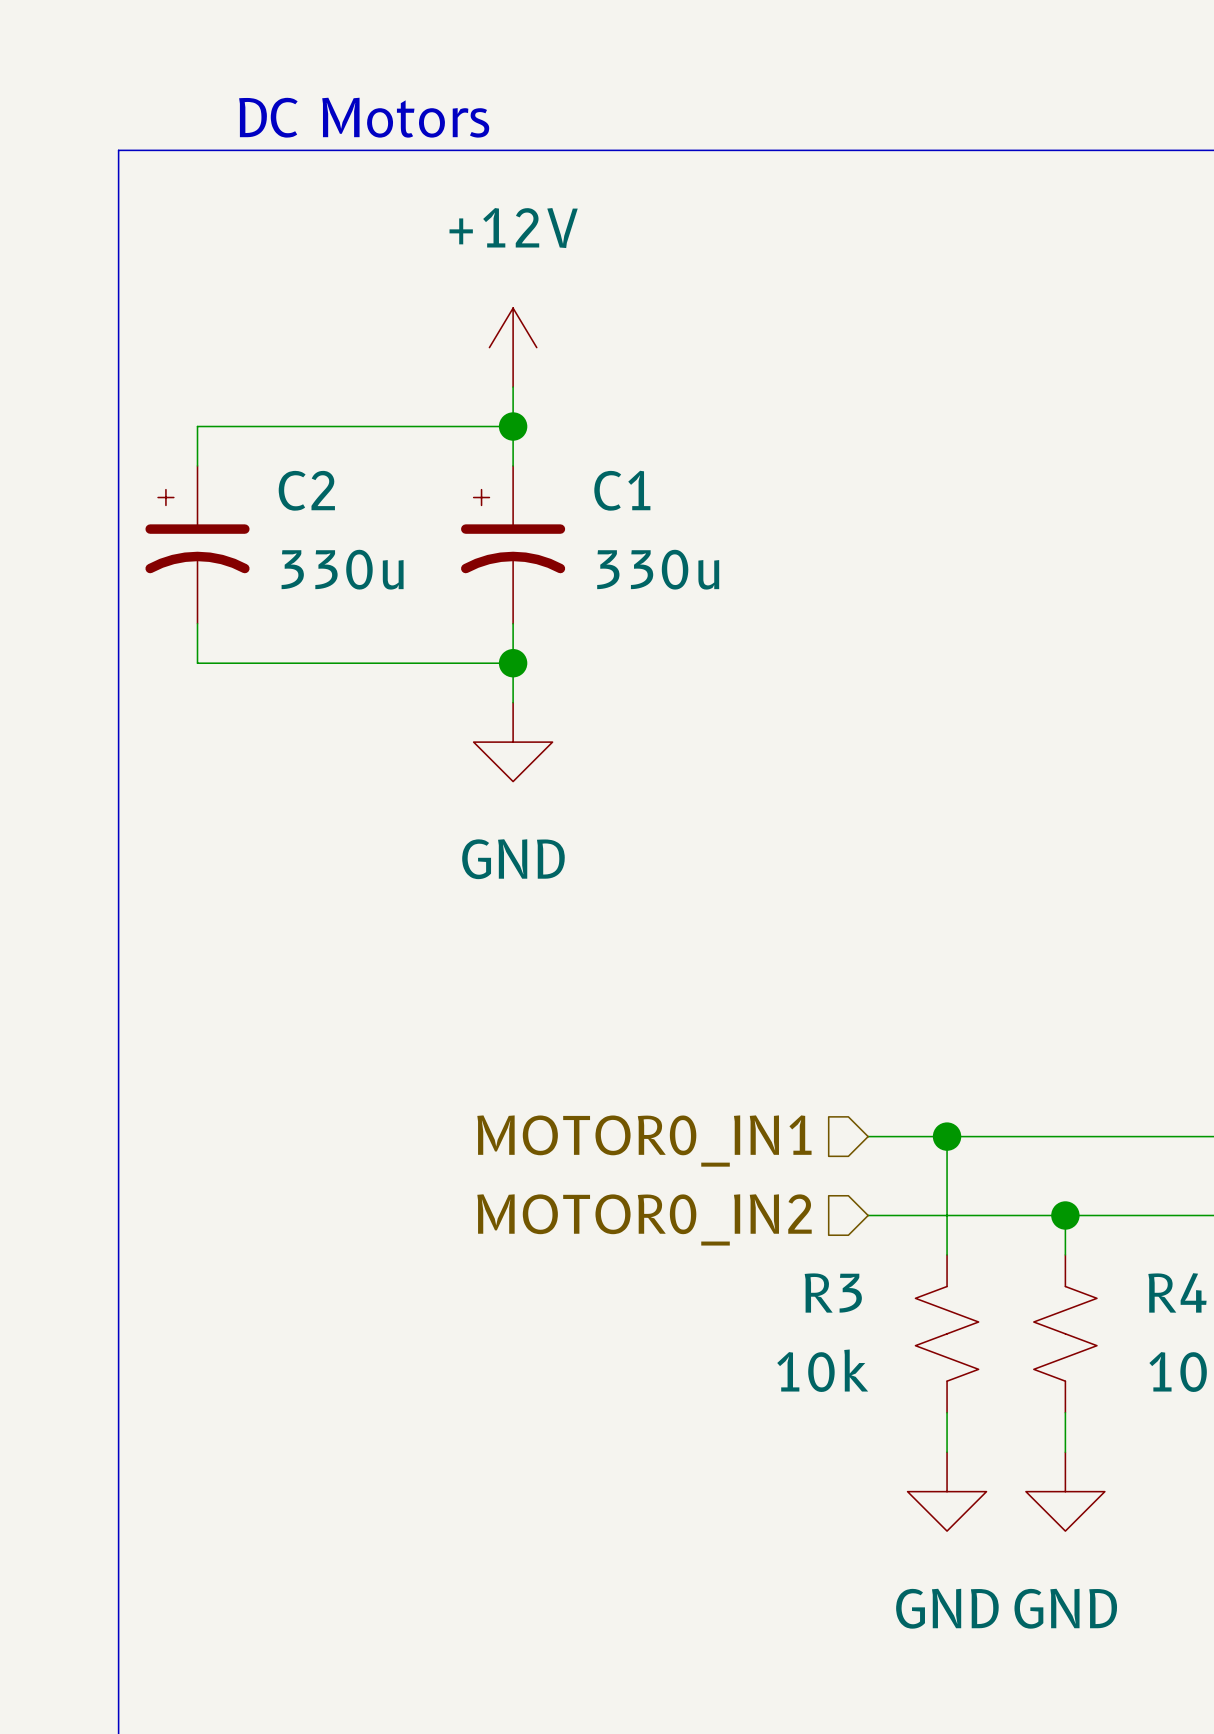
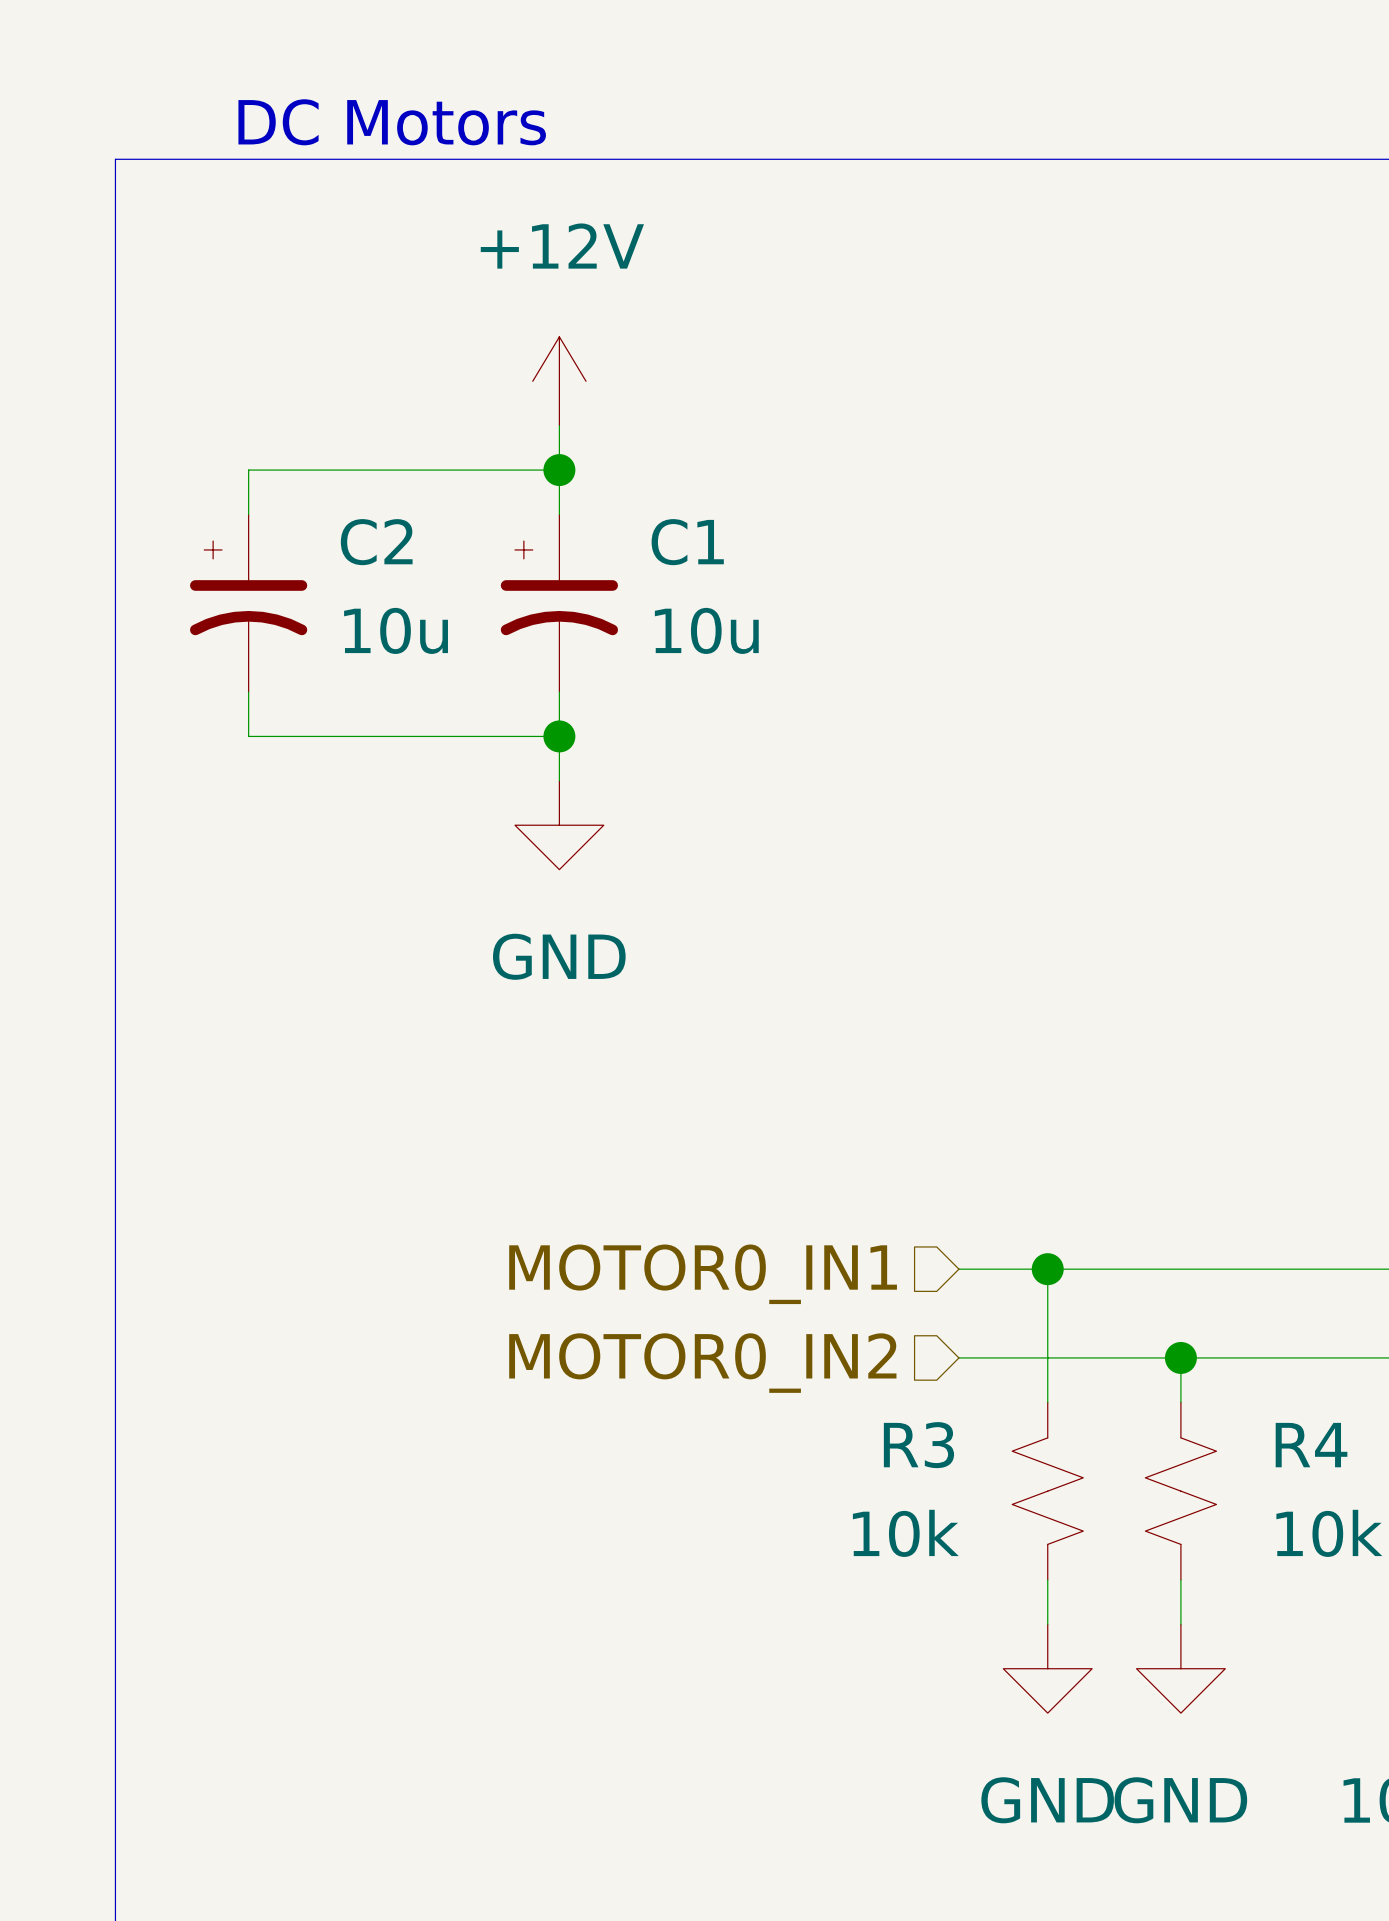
wire: (236, 426) (197, 426) (197, 465) -> (248, 470) (248, 514)
C2 position: (197, 544) -> (248, 603)
C2 value: 330u (342, 569) -> 10u (396, 630)
C1 value: 330u (658, 569) -> 10u (706, 630)
wire: (197, 623) (197, 663) (236, 663) -> (248, 692) (248, 736)

